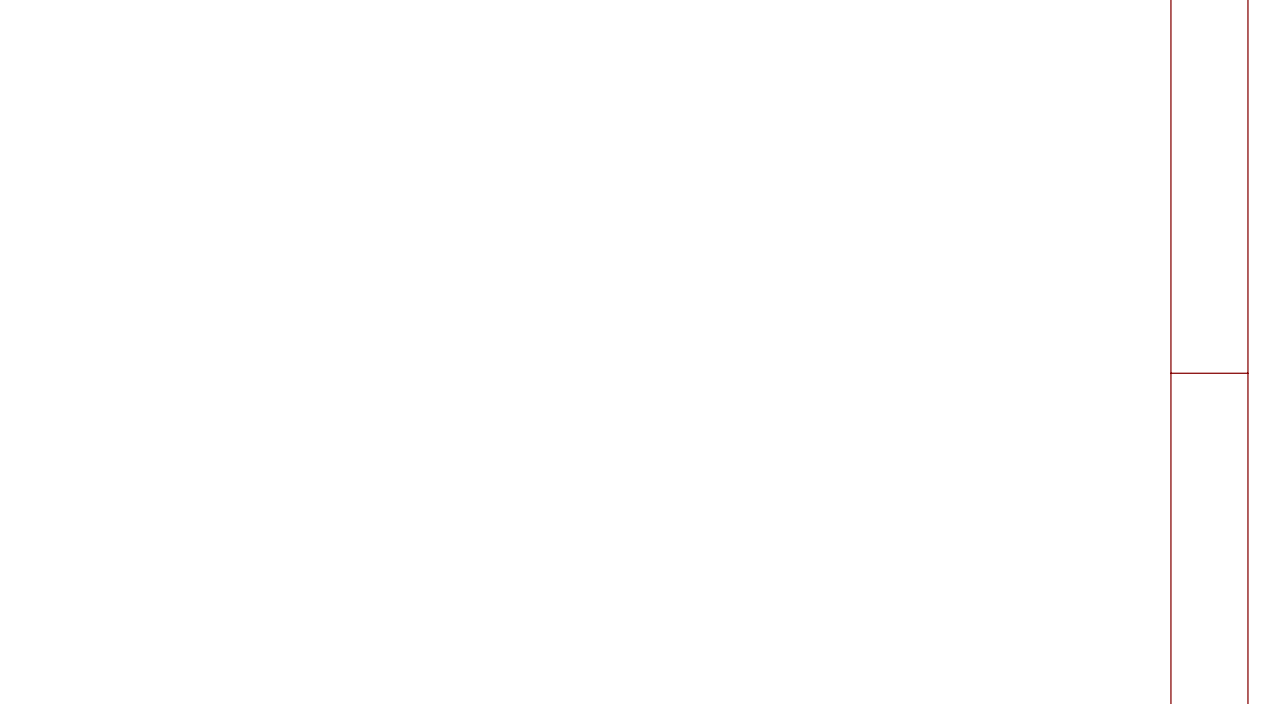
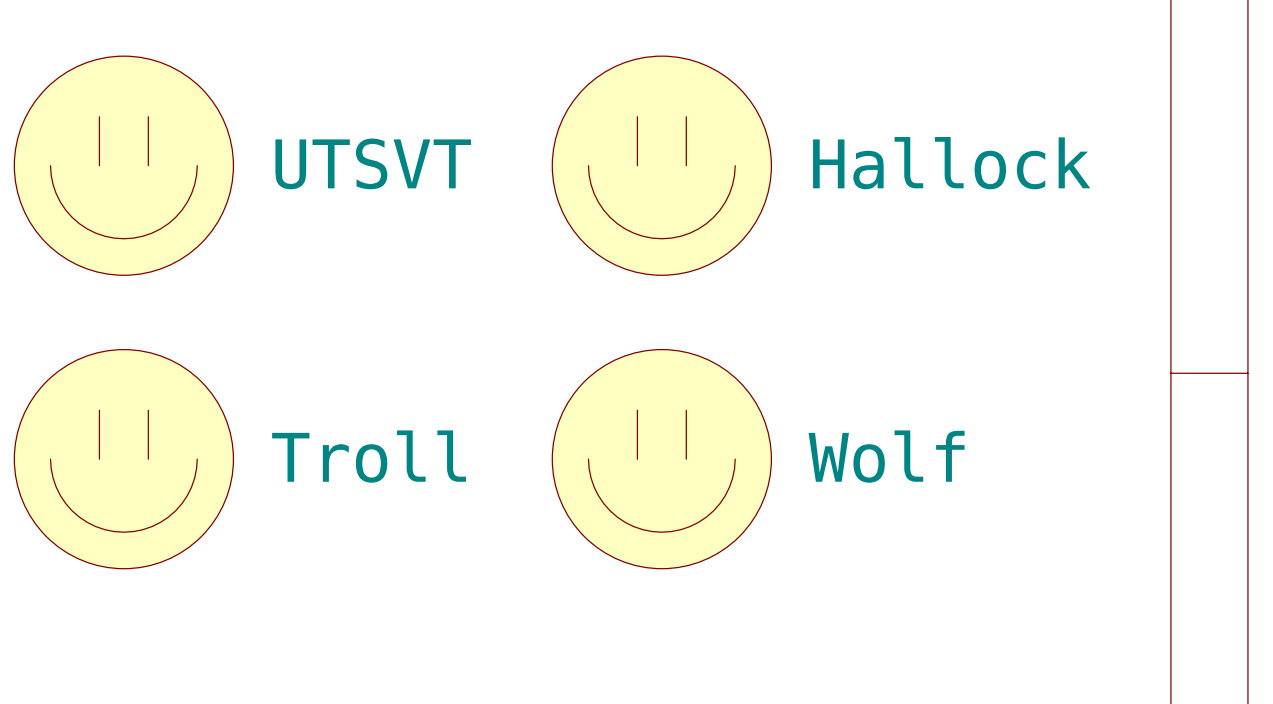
part: none -> UTSVT (123, 165)
part: none -> Hallock (661, 165)
part: none -> Troll (123, 459)
part: none -> Wolf (661, 459)

